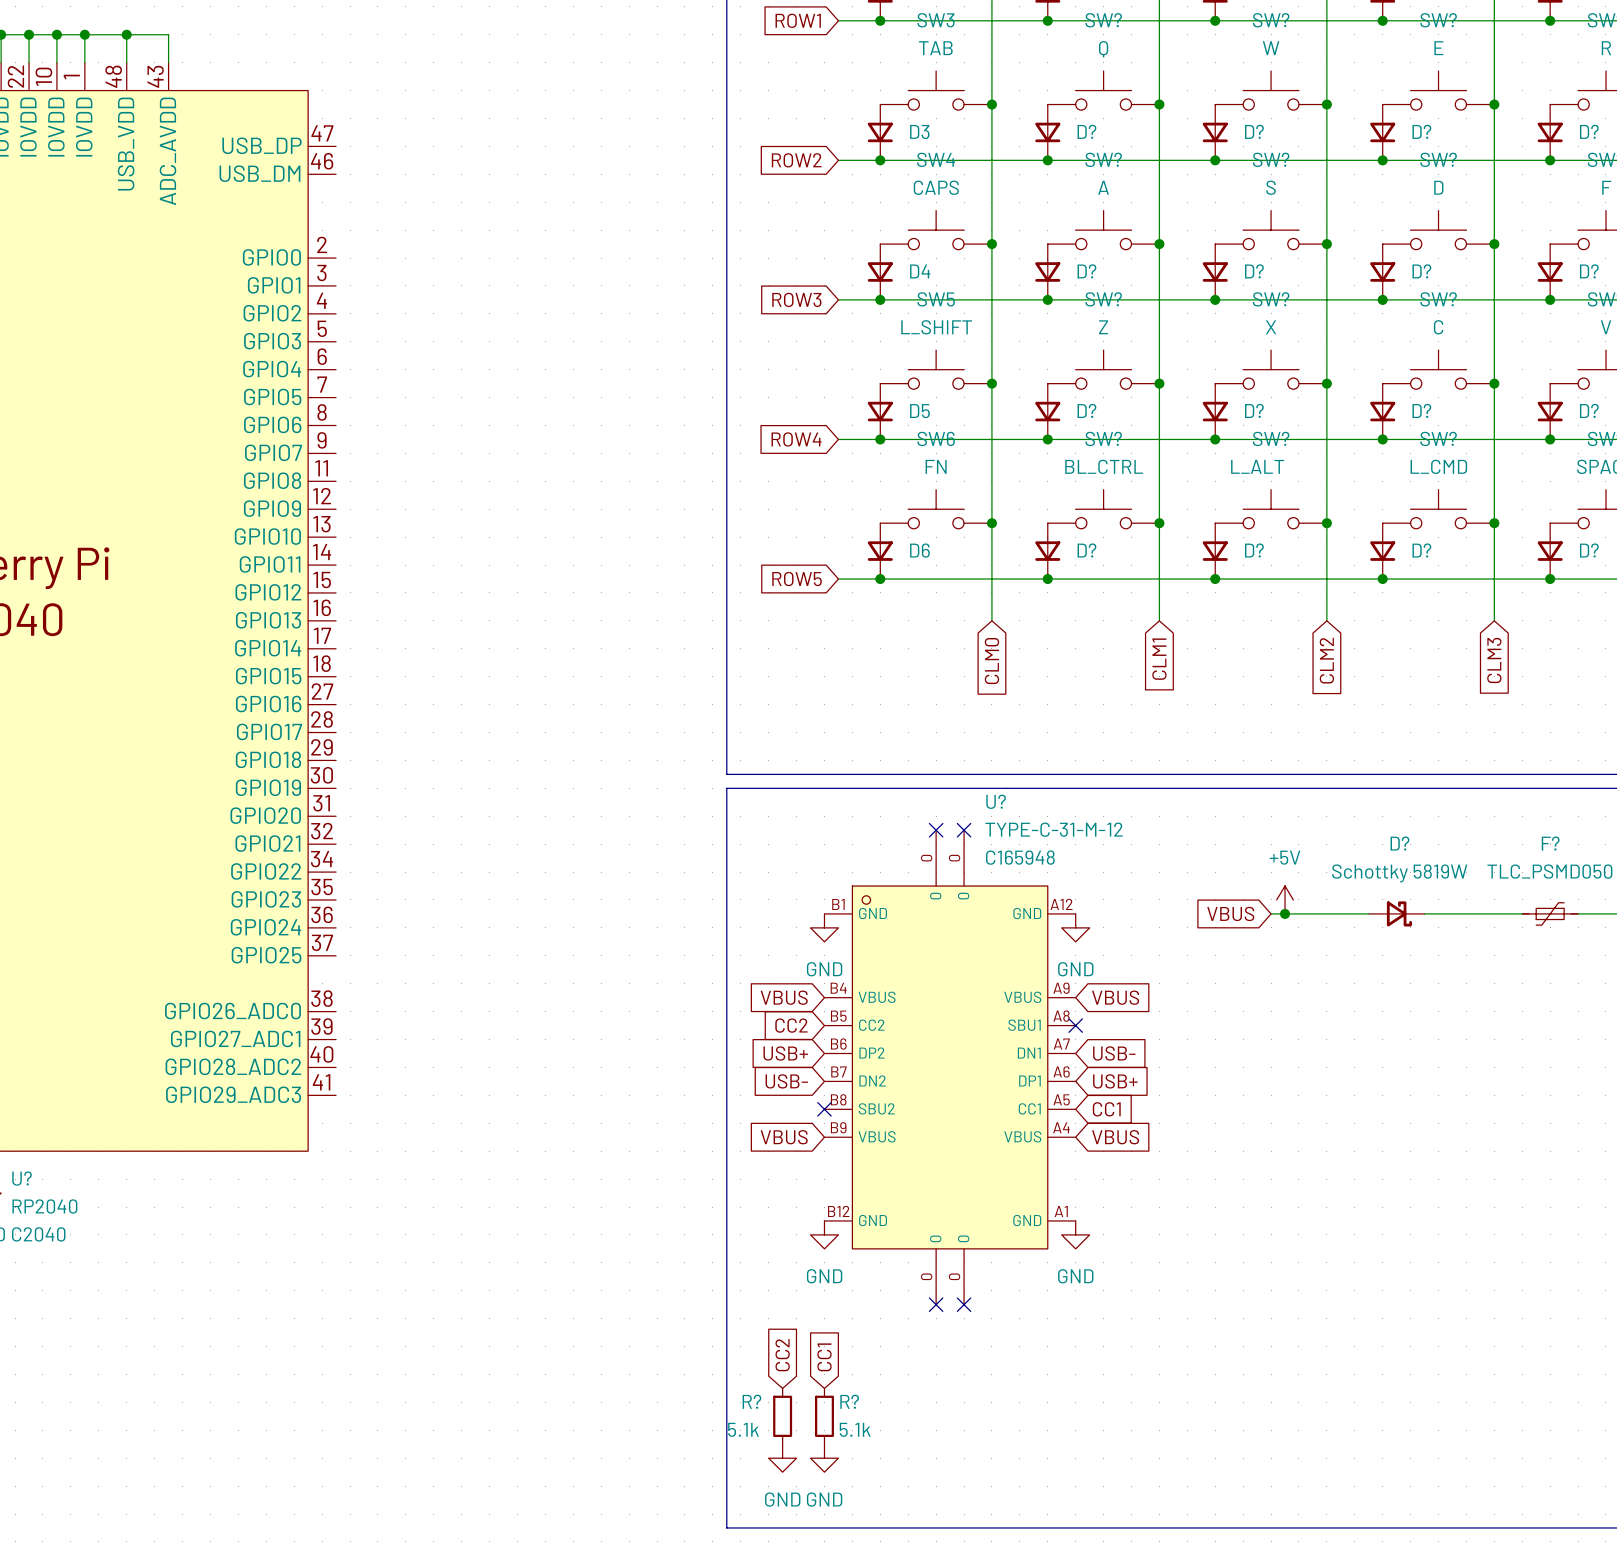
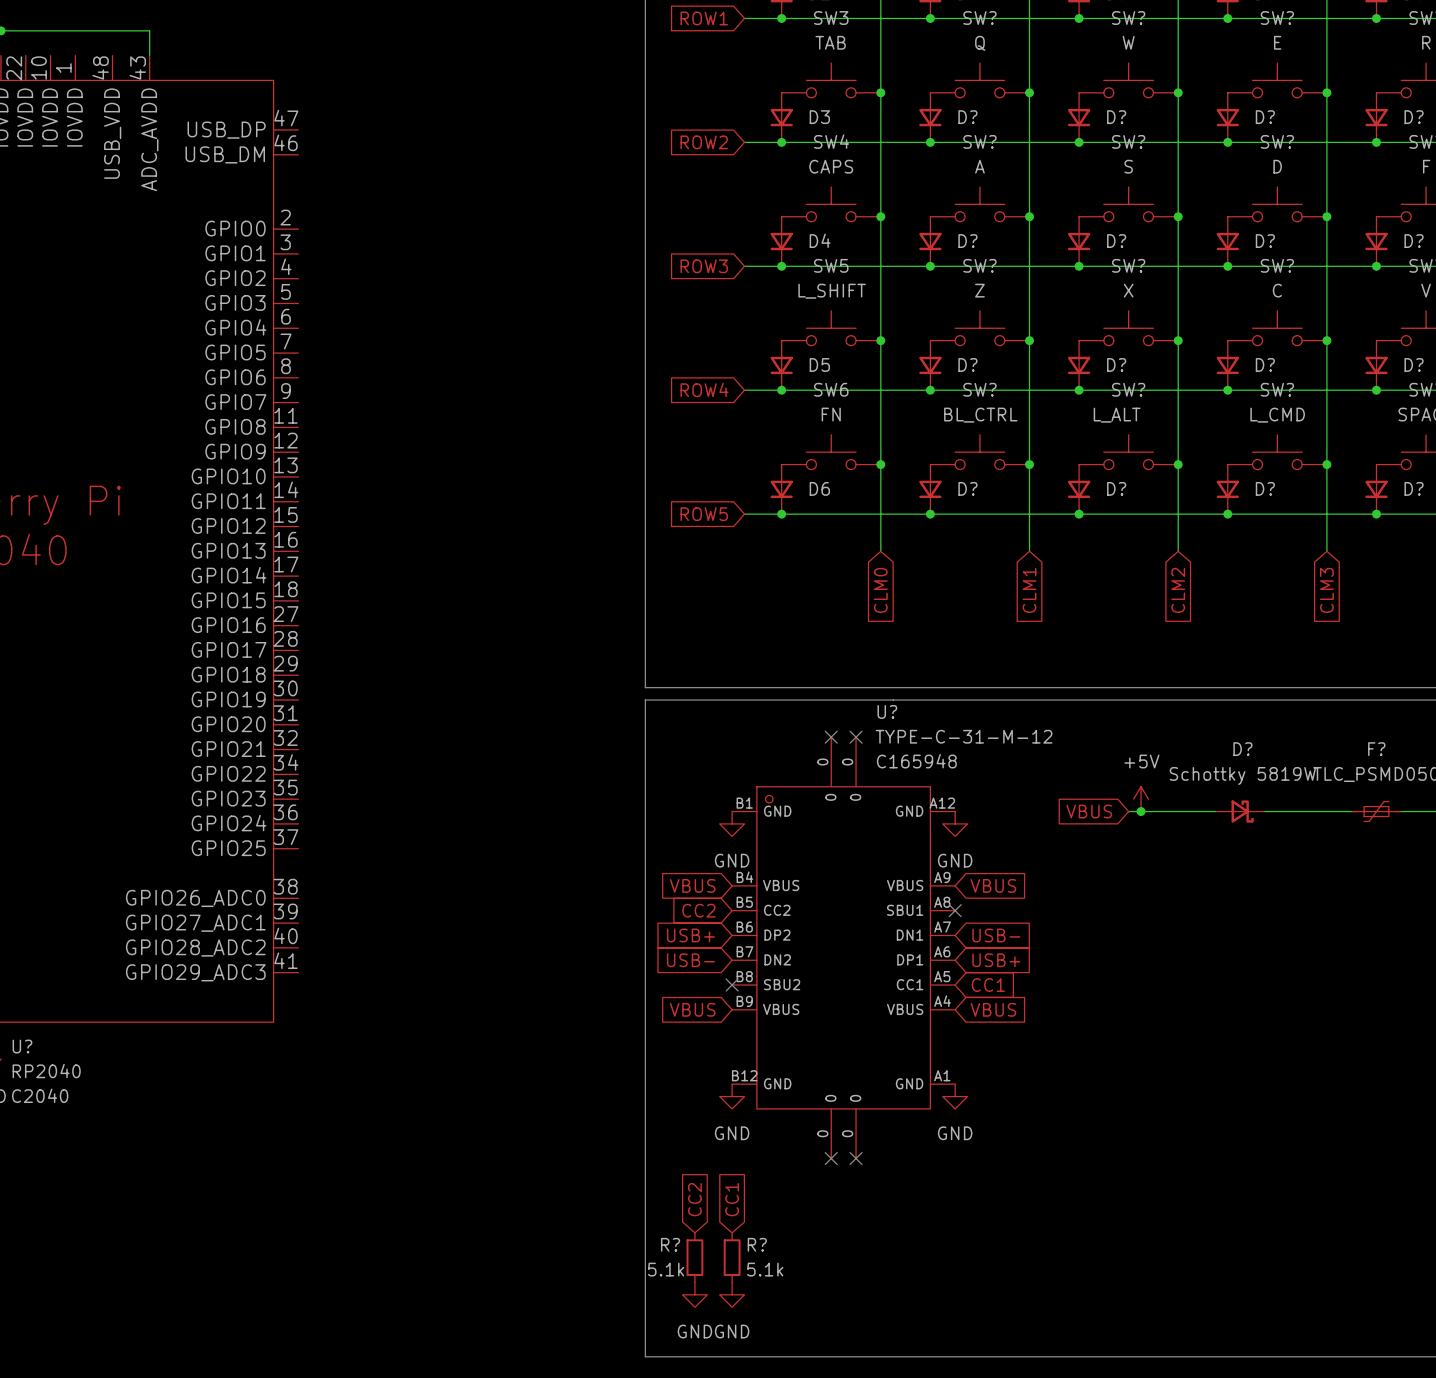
wire: (1, 34) (1, 62) -> none
wire: (29, 34) (29, 62) -> none
junction: (29, 34) -> none
wire: (56, 34) (56, 62) -> none
junction: (56, 34) -> none
wire: (84, 34) (84, 62) -> none
junction: (84, 34) -> none
wire: (126, 34) (126, 62) -> none
junction: (126, 34) -> none

